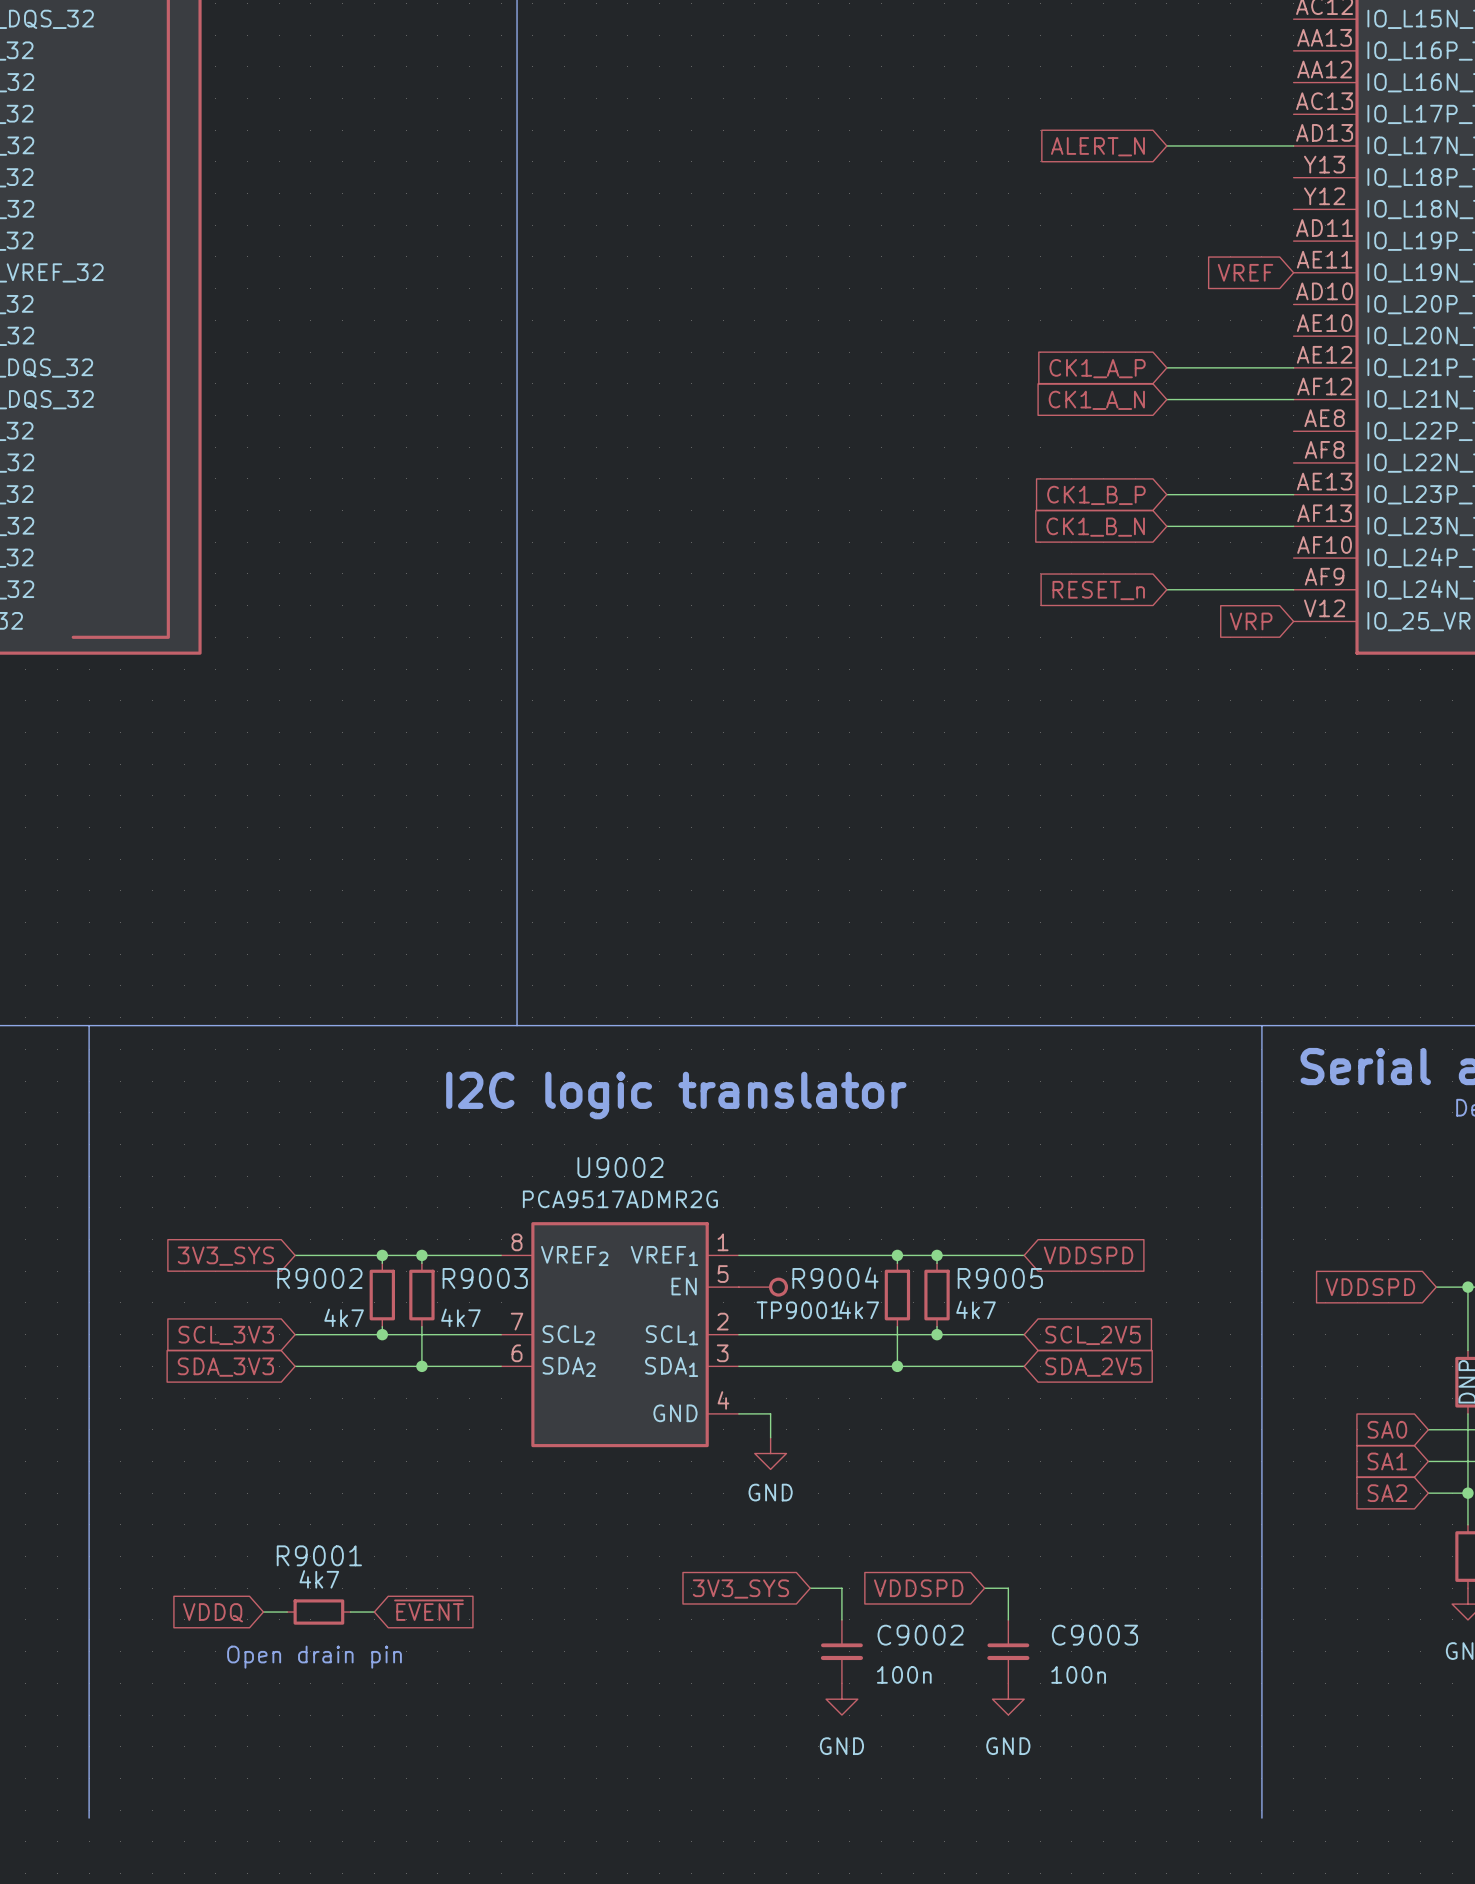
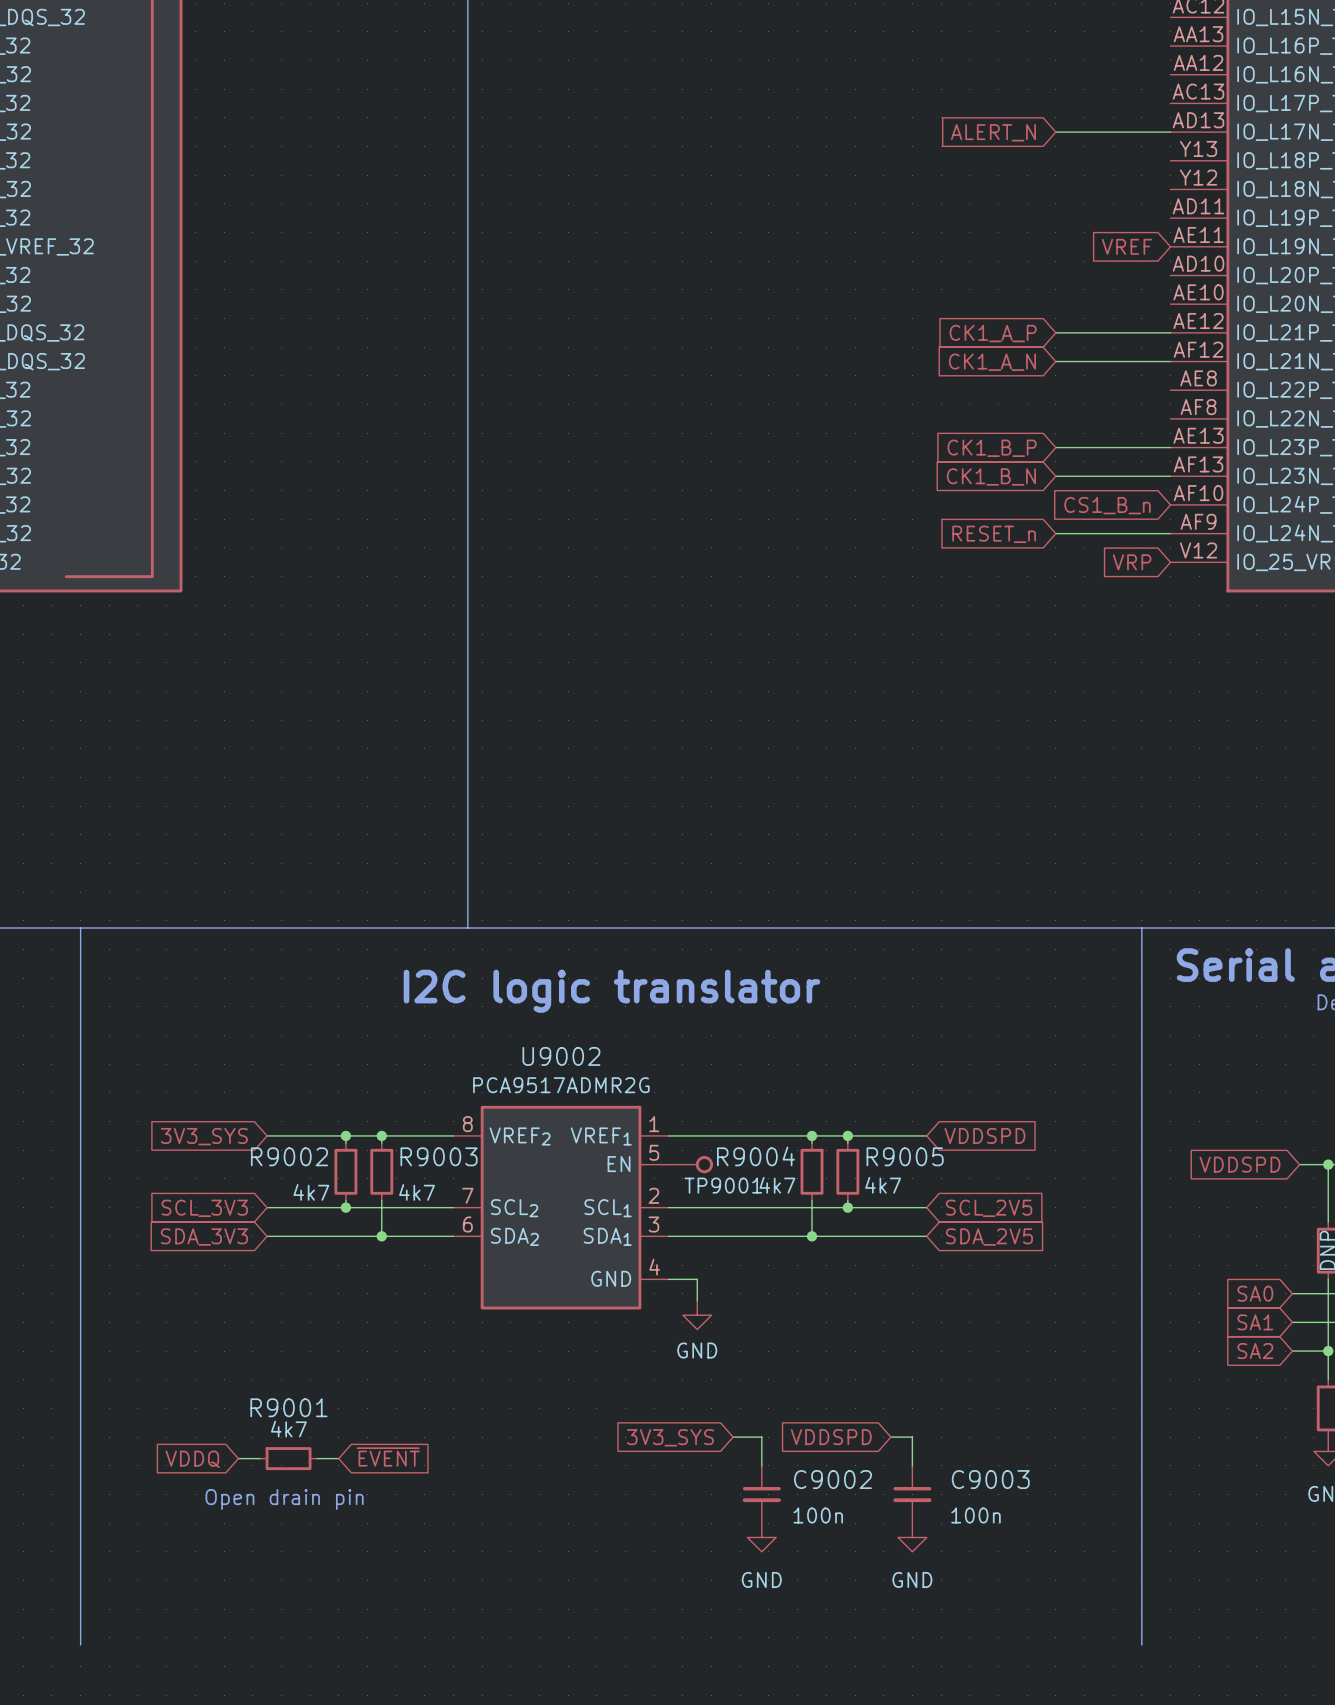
global label: none -> CS1_B_n (1107, 505)

